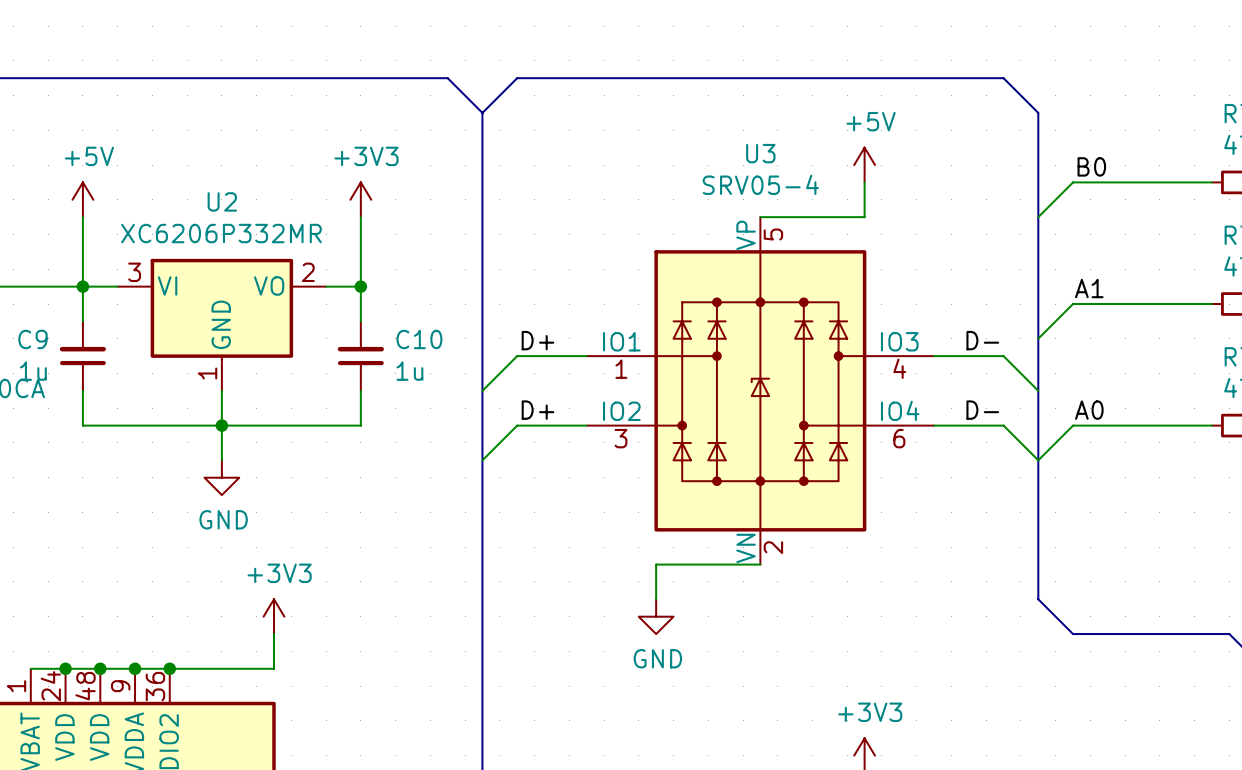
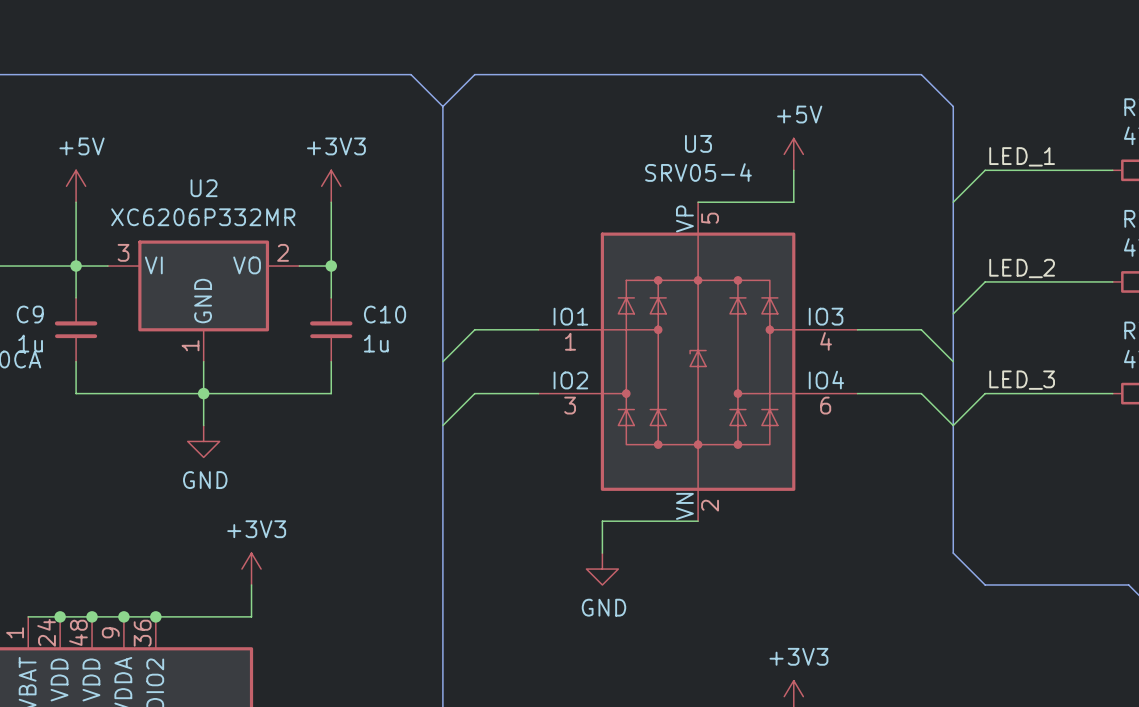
label: B0 (1091, 166) -> LED_1 (1022, 156)
label: A1 (1089, 288) -> LED_2 (1022, 268)
label: D+ (538, 340) -> none
label: D- (982, 340) -> none
label: D+ (538, 410) -> none
label: D- (982, 410) -> none
label: A0 (1089, 410) -> LED_3 (1022, 380)

